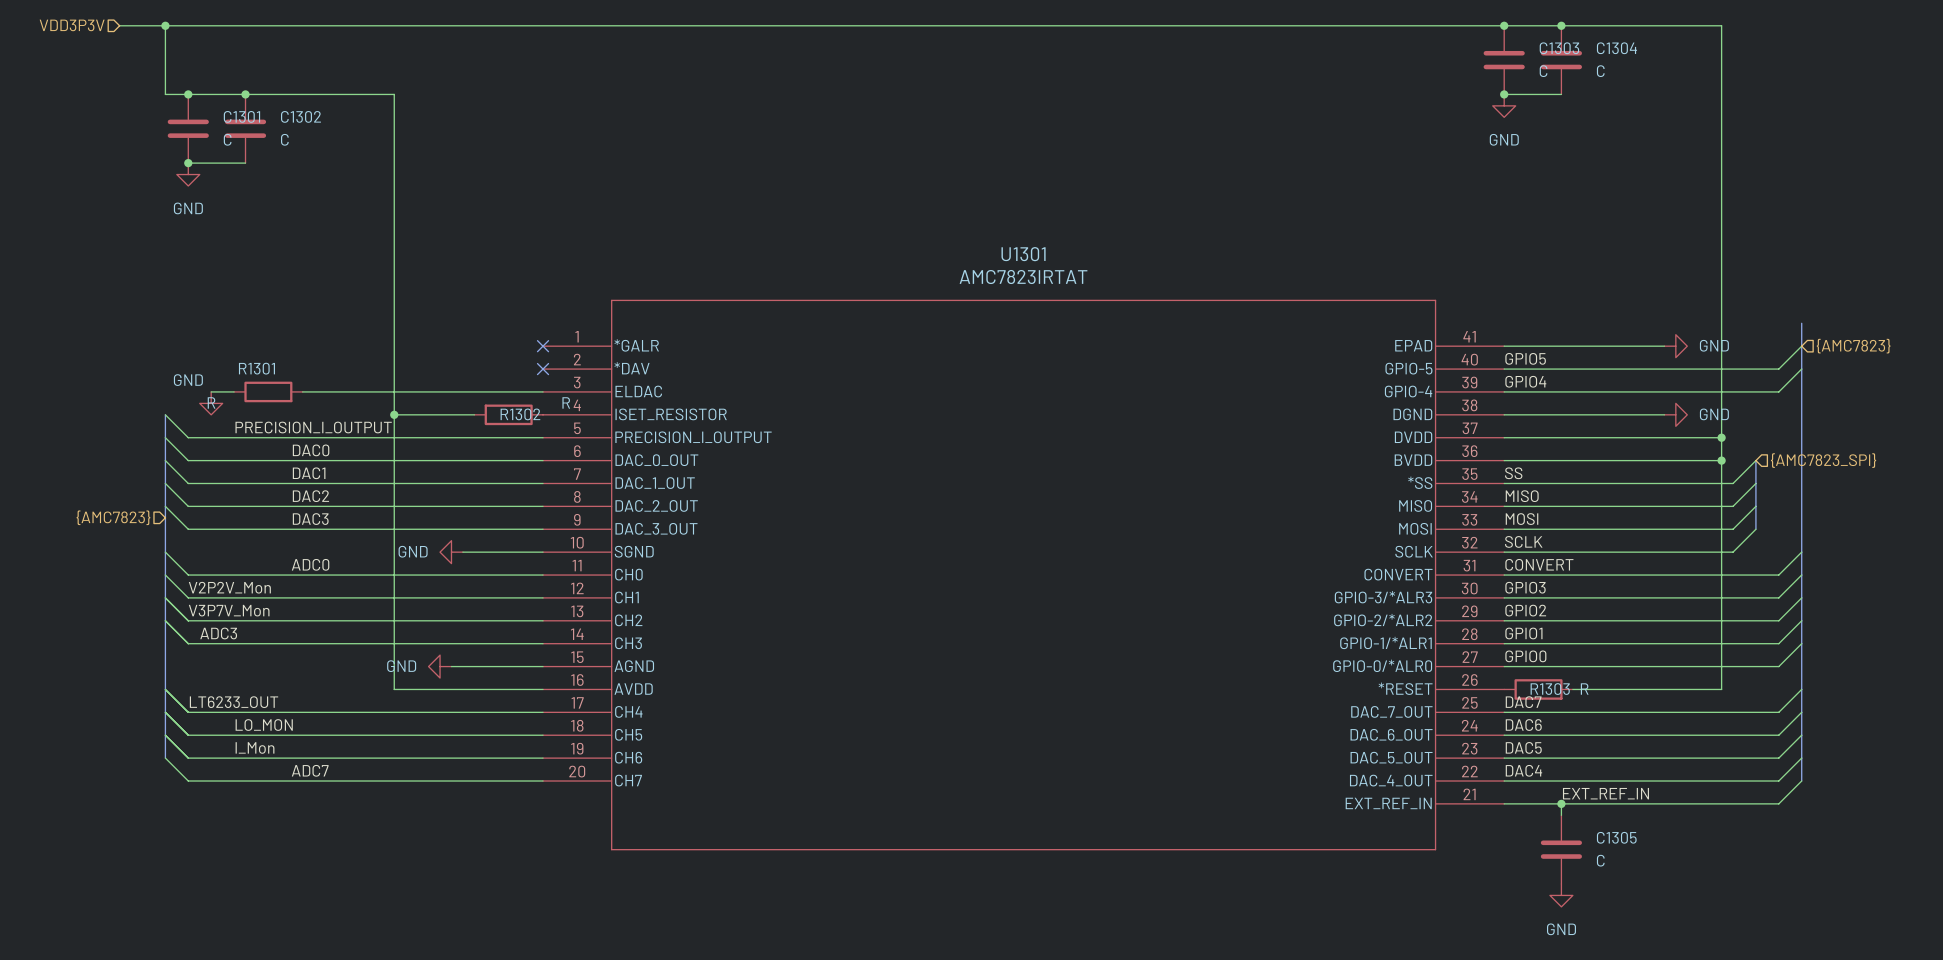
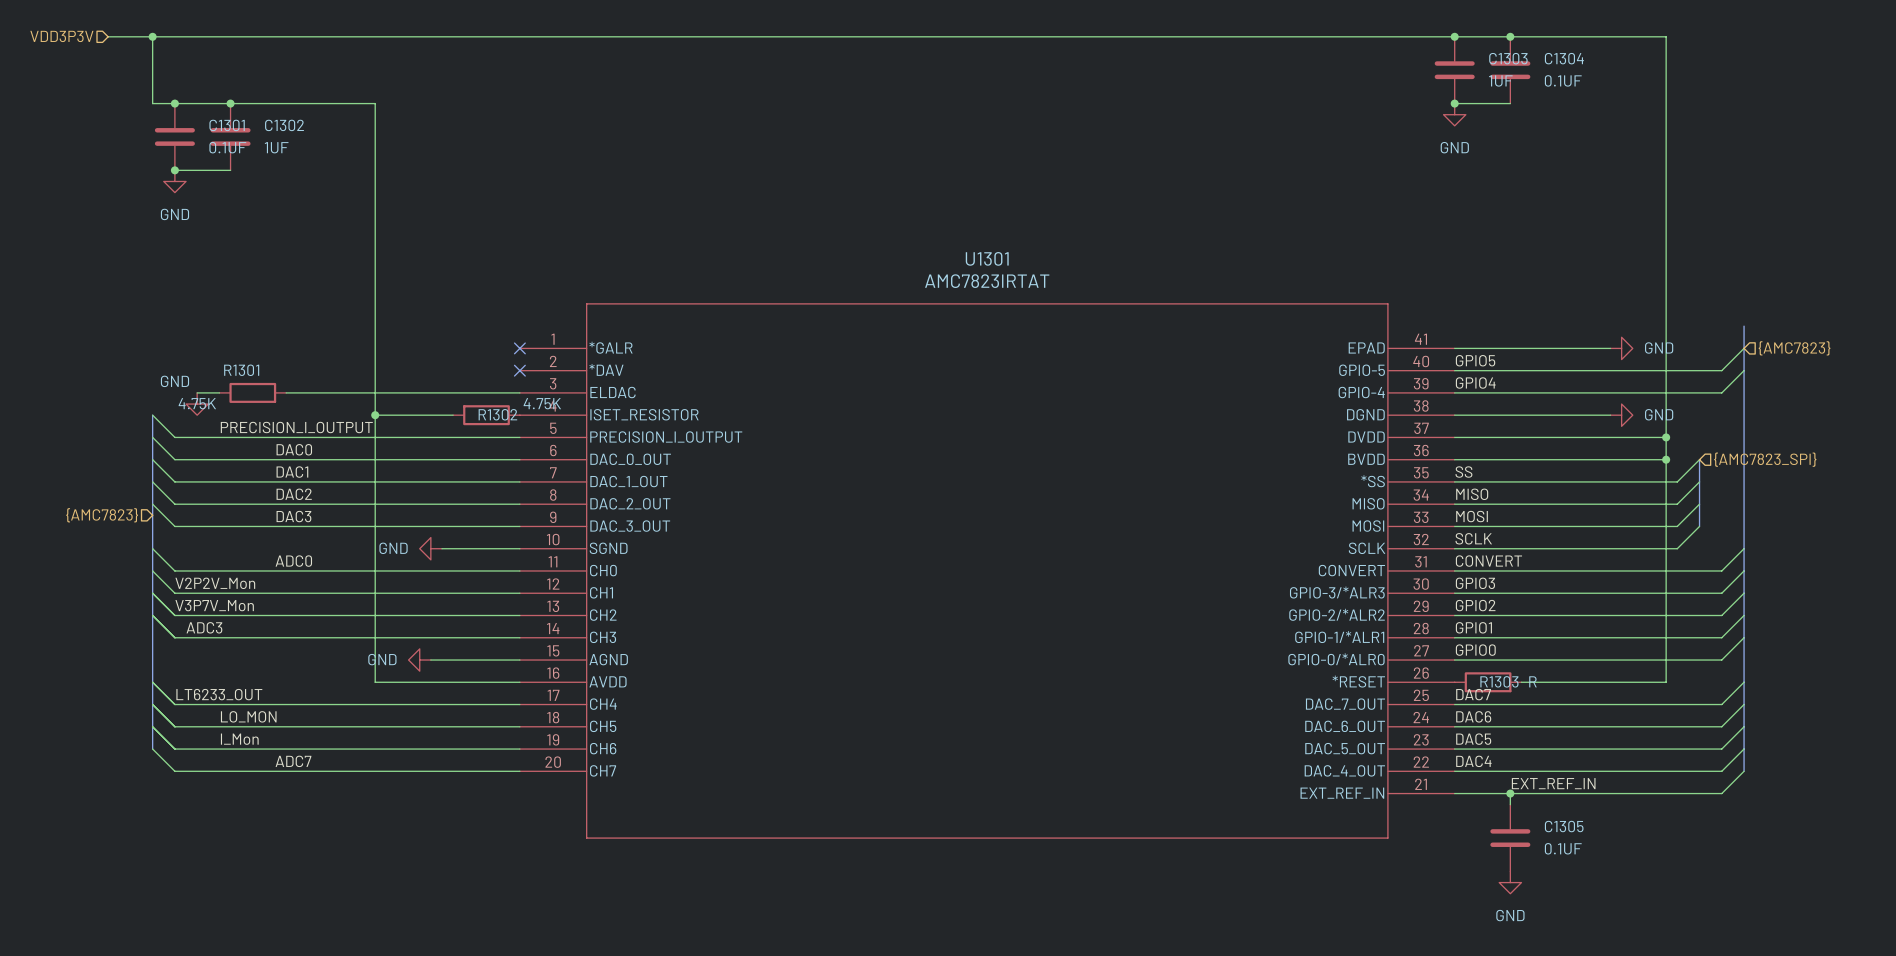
C1303 value: C (1543, 71) -> 1UF (1500, 80)
C1304 value: C (1600, 71) -> 0.1UF (1563, 80)
C1301 value: C (227, 139) -> 0.1UF (227, 147)
C1302 value: C (284, 139) -> 1UF (276, 147)
R1301 value: R (211, 402) -> 4.75K (197, 403)
R1302 value: R (566, 402) -> 4.75K (542, 403)
C1305 value: C (1600, 860) -> 0.1UF (1563, 848)

